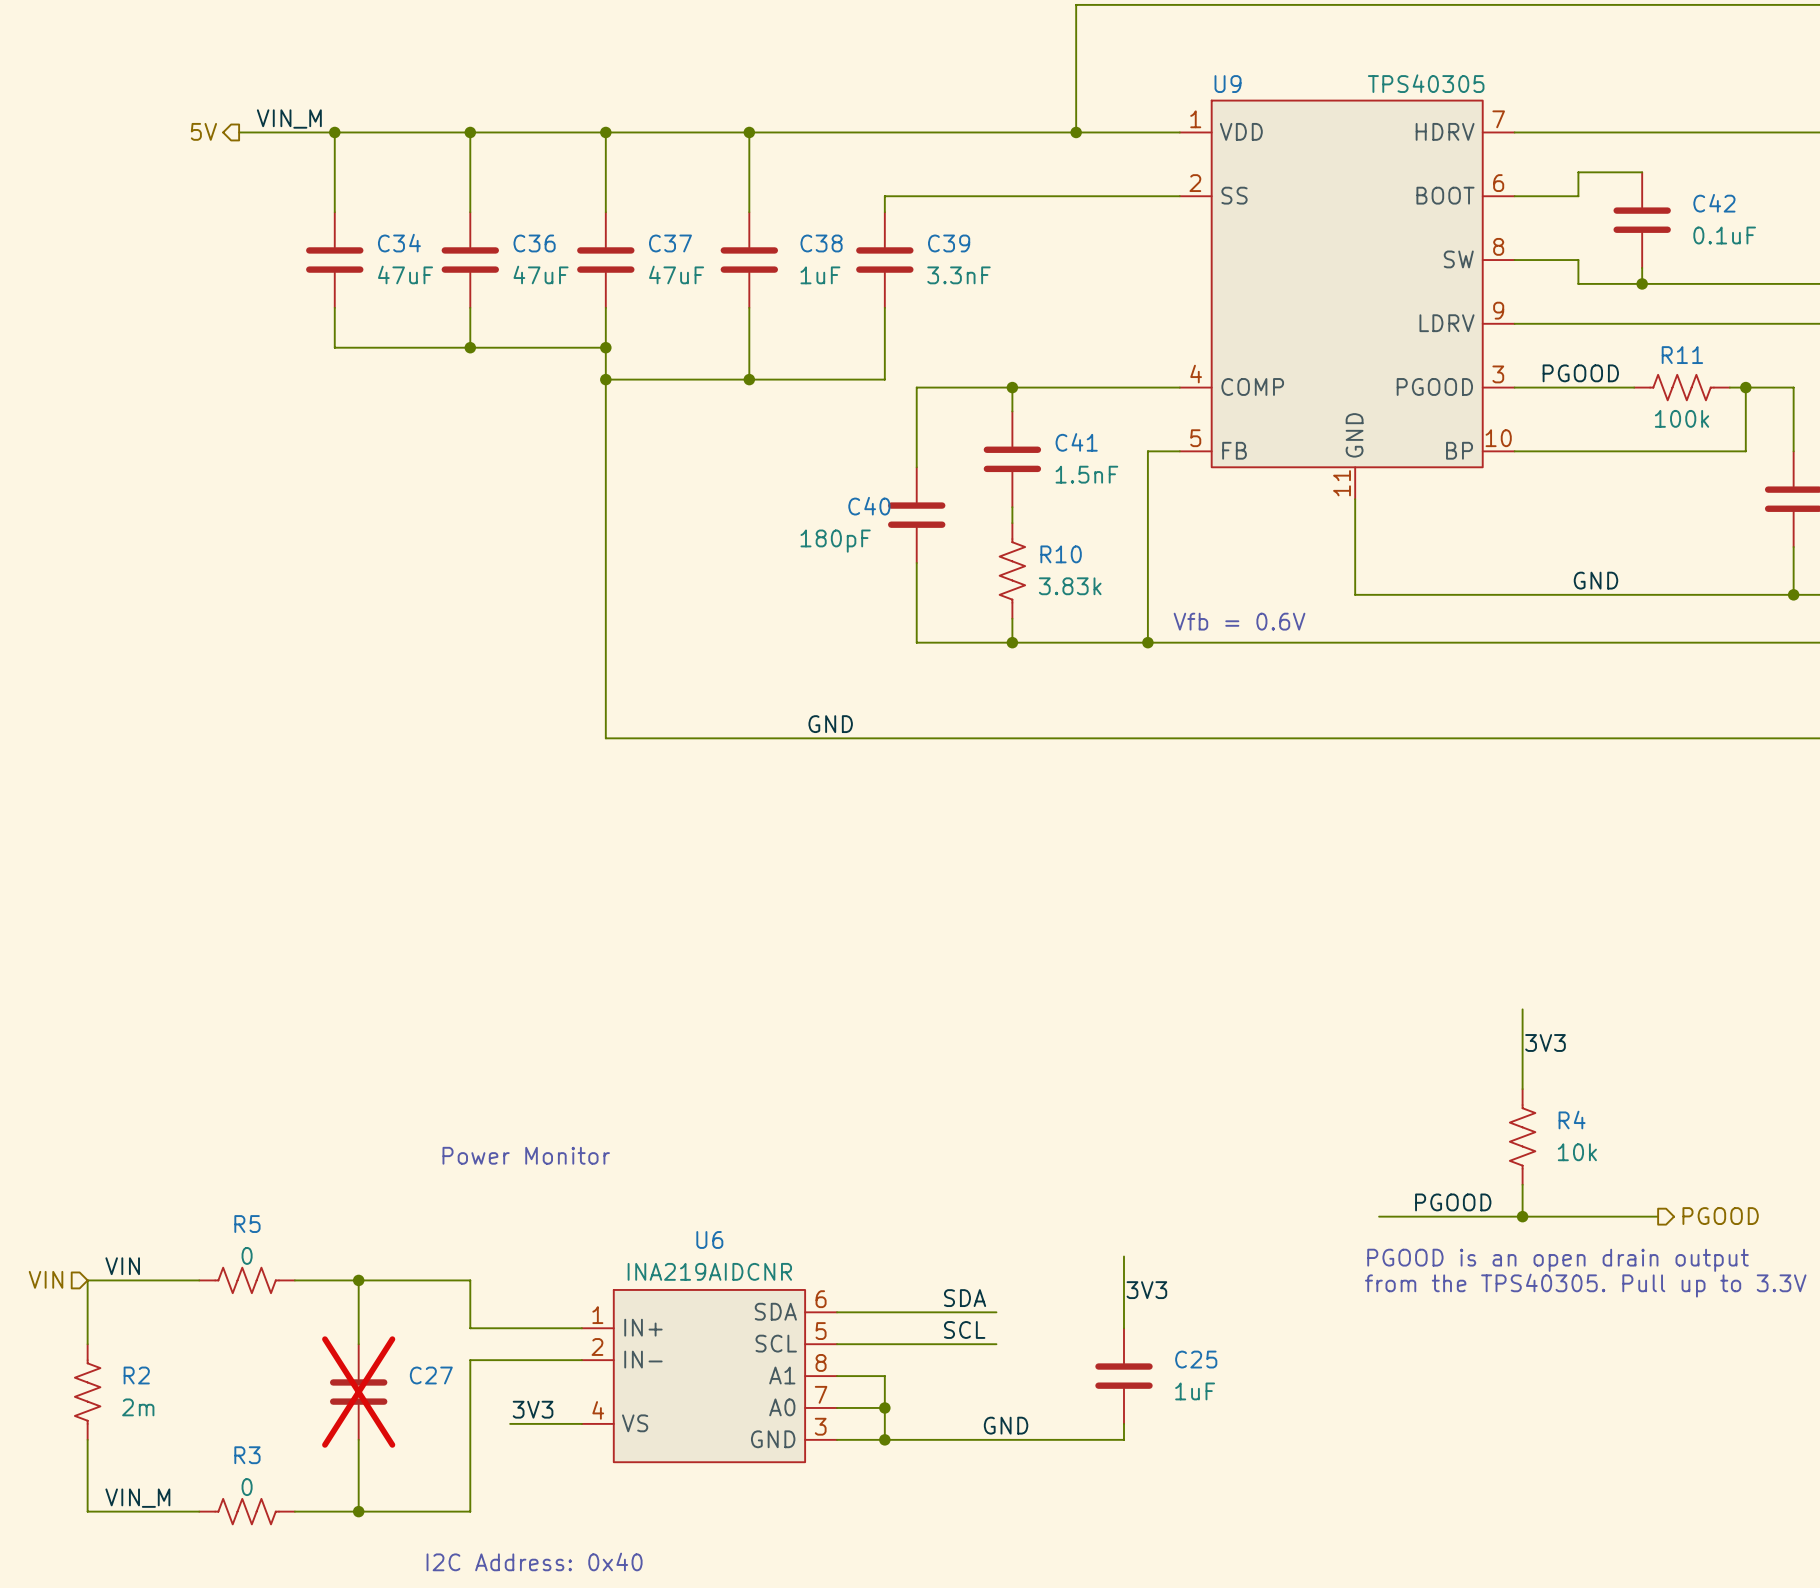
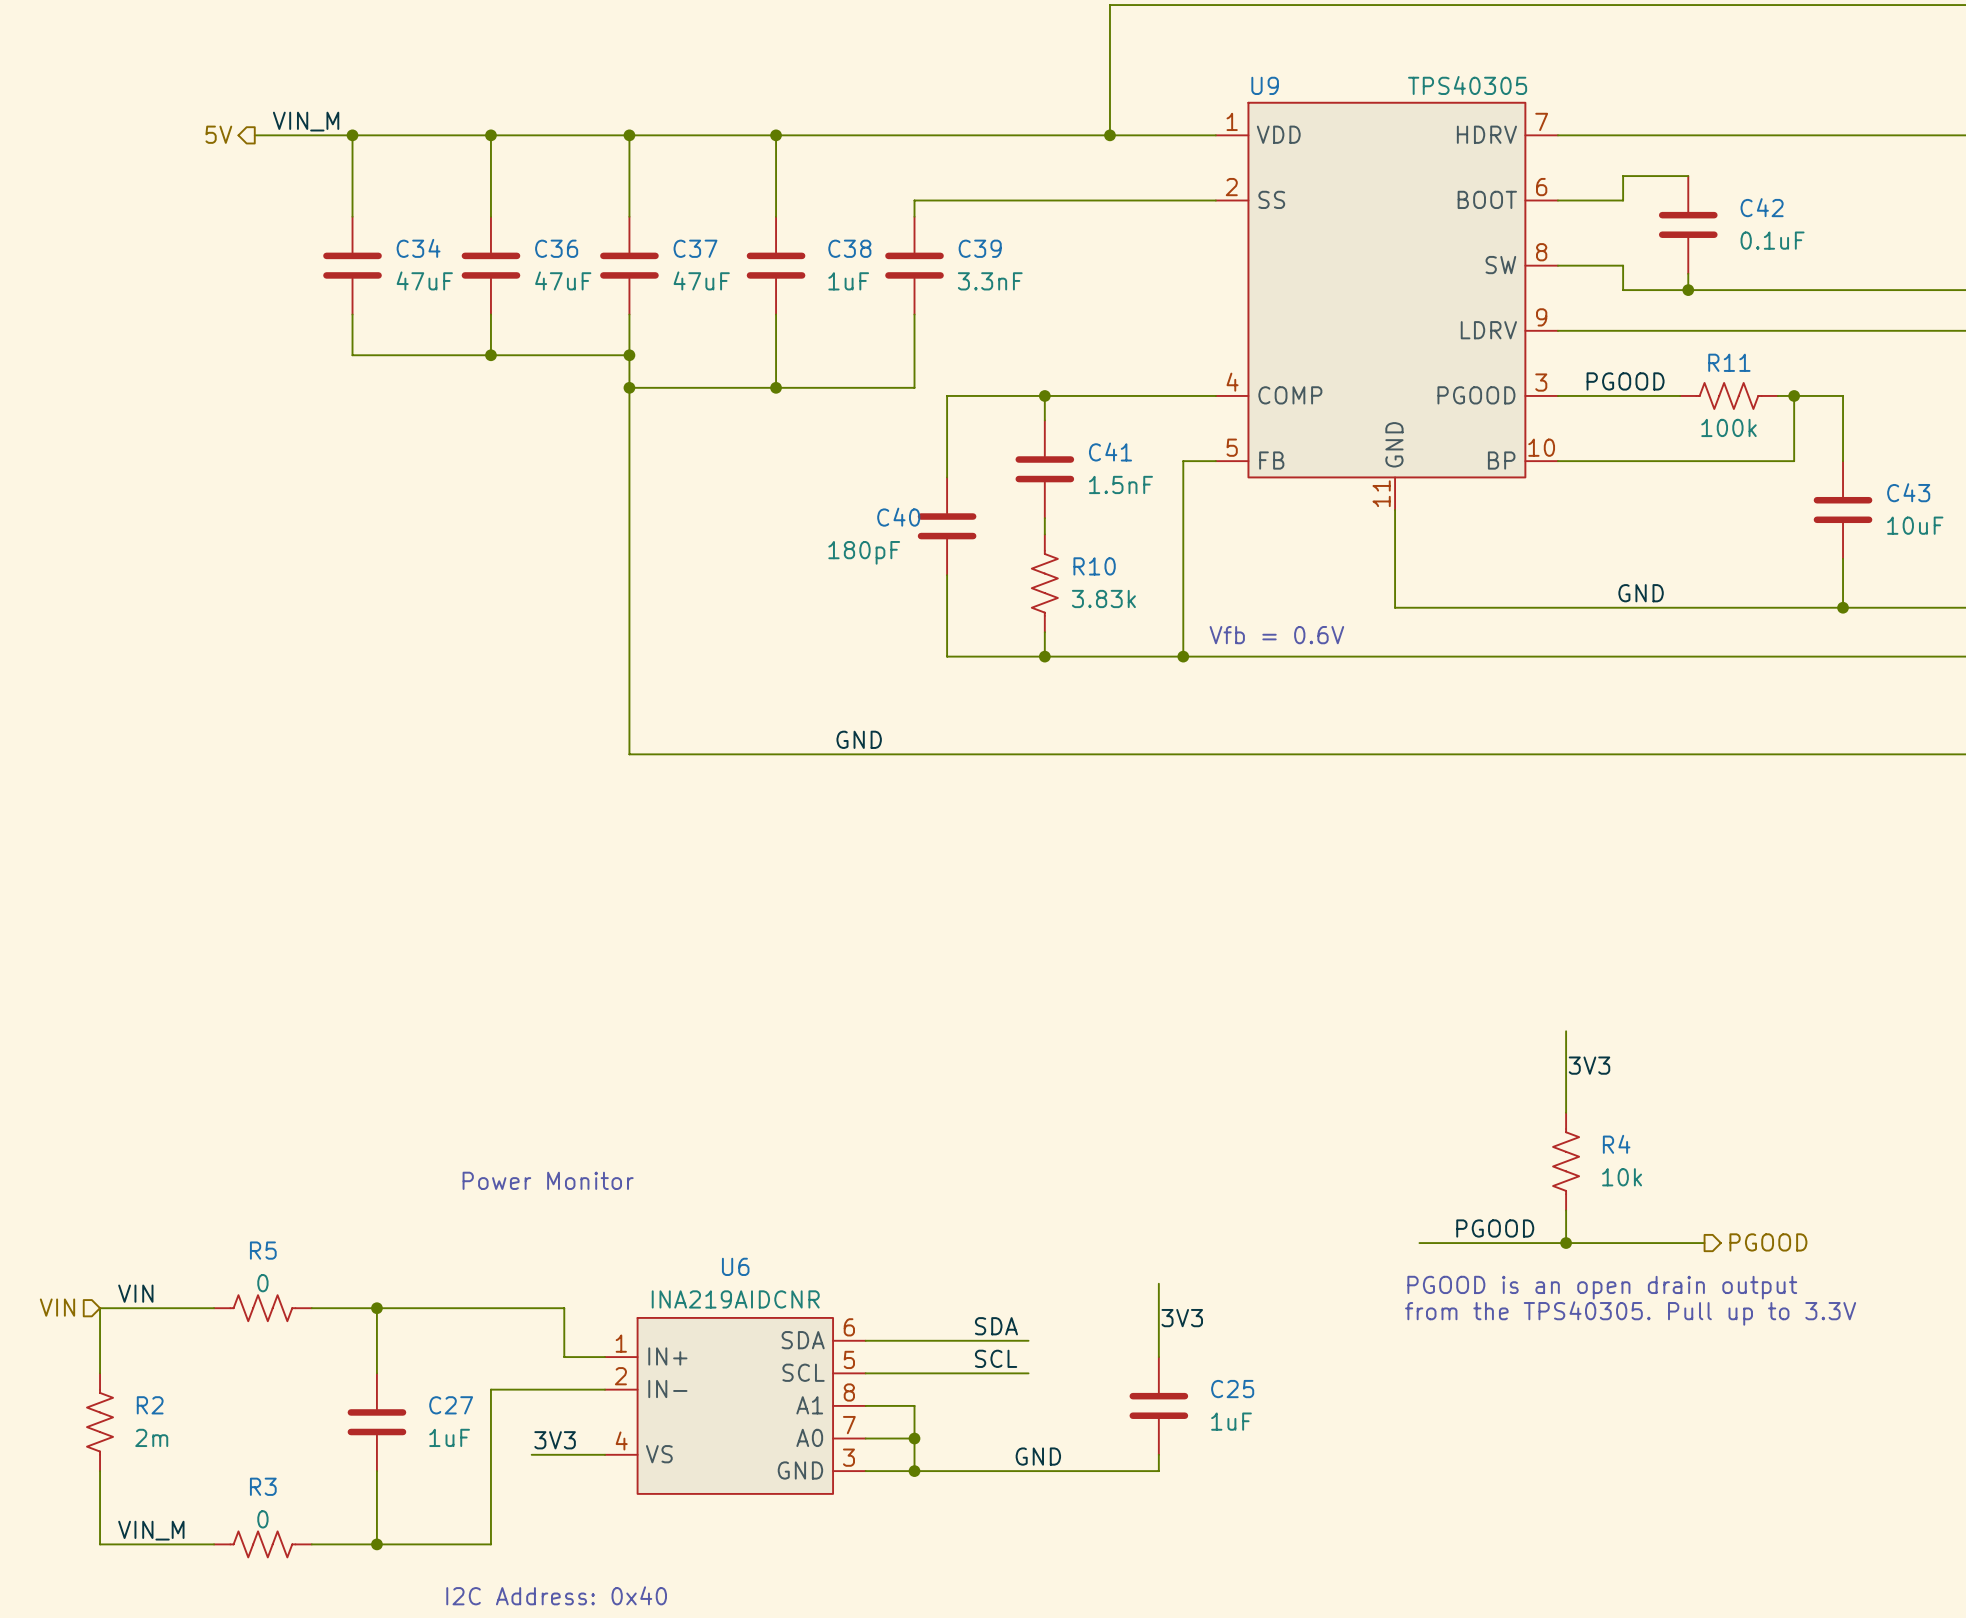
wire: (470, 1280) (470, 1328) (542, 1328) -> (490, 1308) (564, 1308) (564, 1357)
C27 do-not-place cross: (358, 1392) -> none
C27 value: none -> 1uF (449, 1437)

